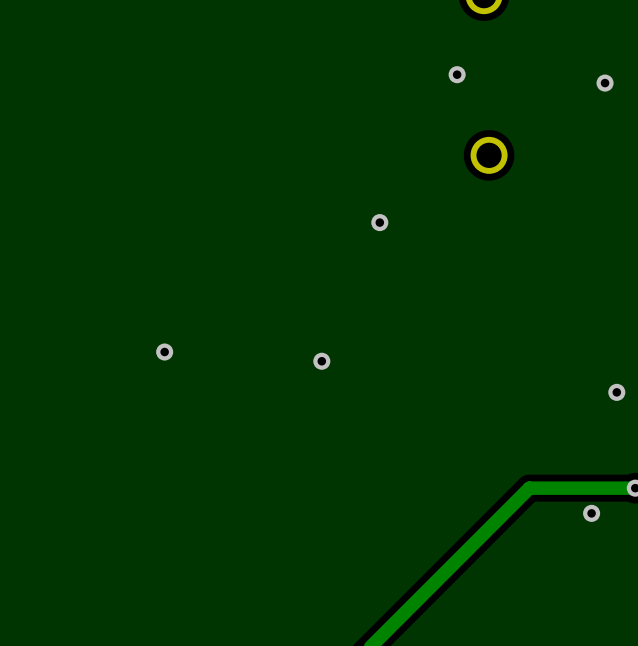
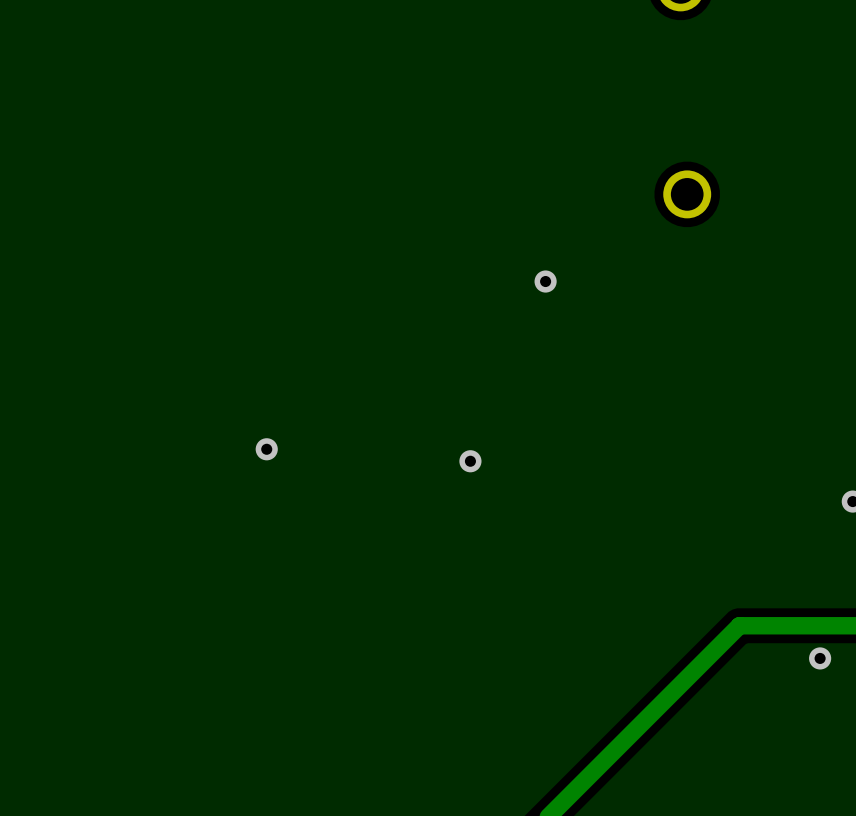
via: (457, 74) -> none
via: (605, 83) -> none

